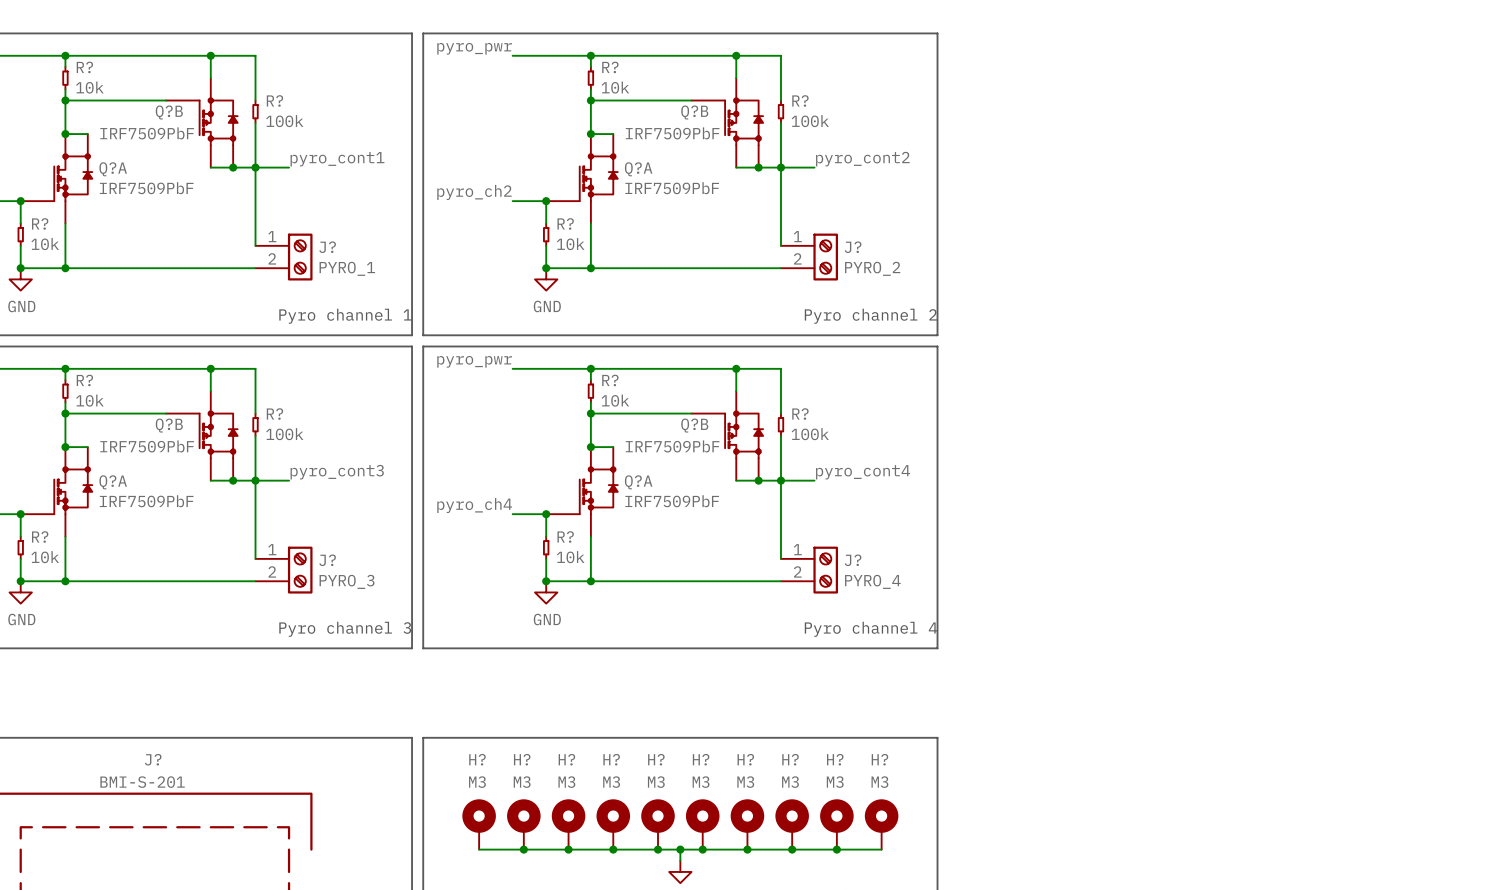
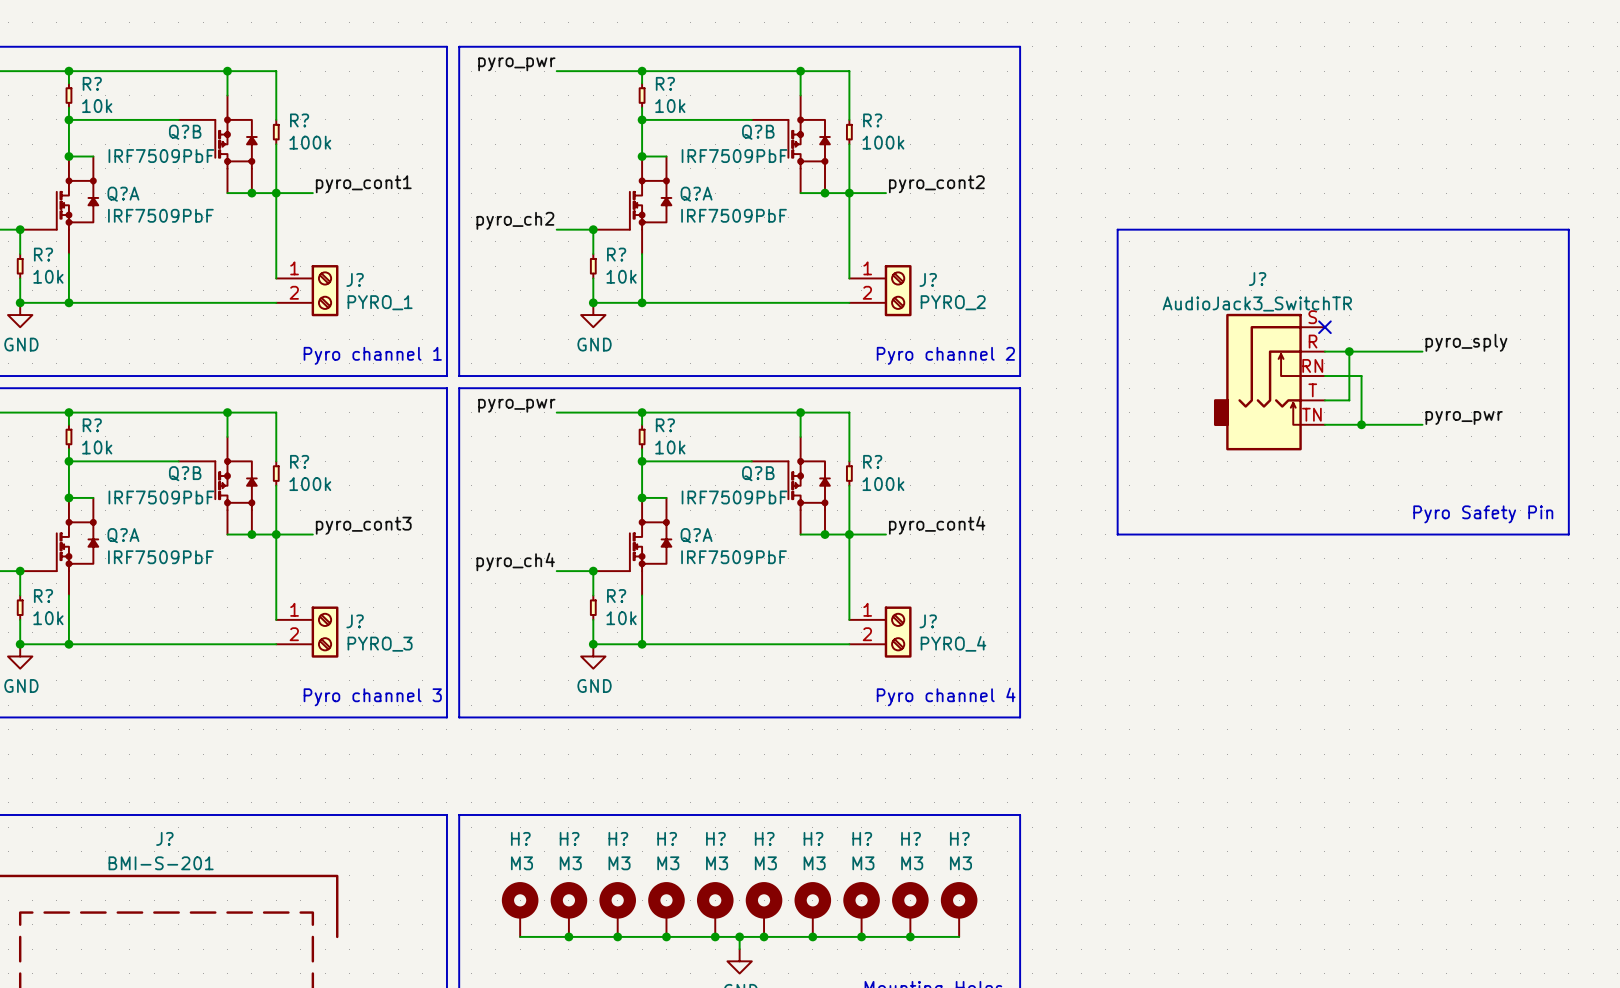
line: none -> (1117, 229) (1568, 229) (1568, 534) (1117, 534) (1117, 229)
no-connect mark: none -> (1324, 327)
label: none -> pyro_sply (1466, 342)
wire: none -> (1324, 351) (1422, 351)
wire: none -> (1349, 351) (1349, 400) (1324, 400)
junction: none -> (1349, 351)
wire: none -> (1324, 376) (1361, 376) (1361, 424)
J?: none -> AudioJack3_SwitchTR (1269, 382)
label: none -> pyro_pwr (1464, 417)
wire: none -> (1324, 424) (1422, 424)
junction: none -> (1361, 424)
text: none -> Pyro Safety Pin (1483, 514)

